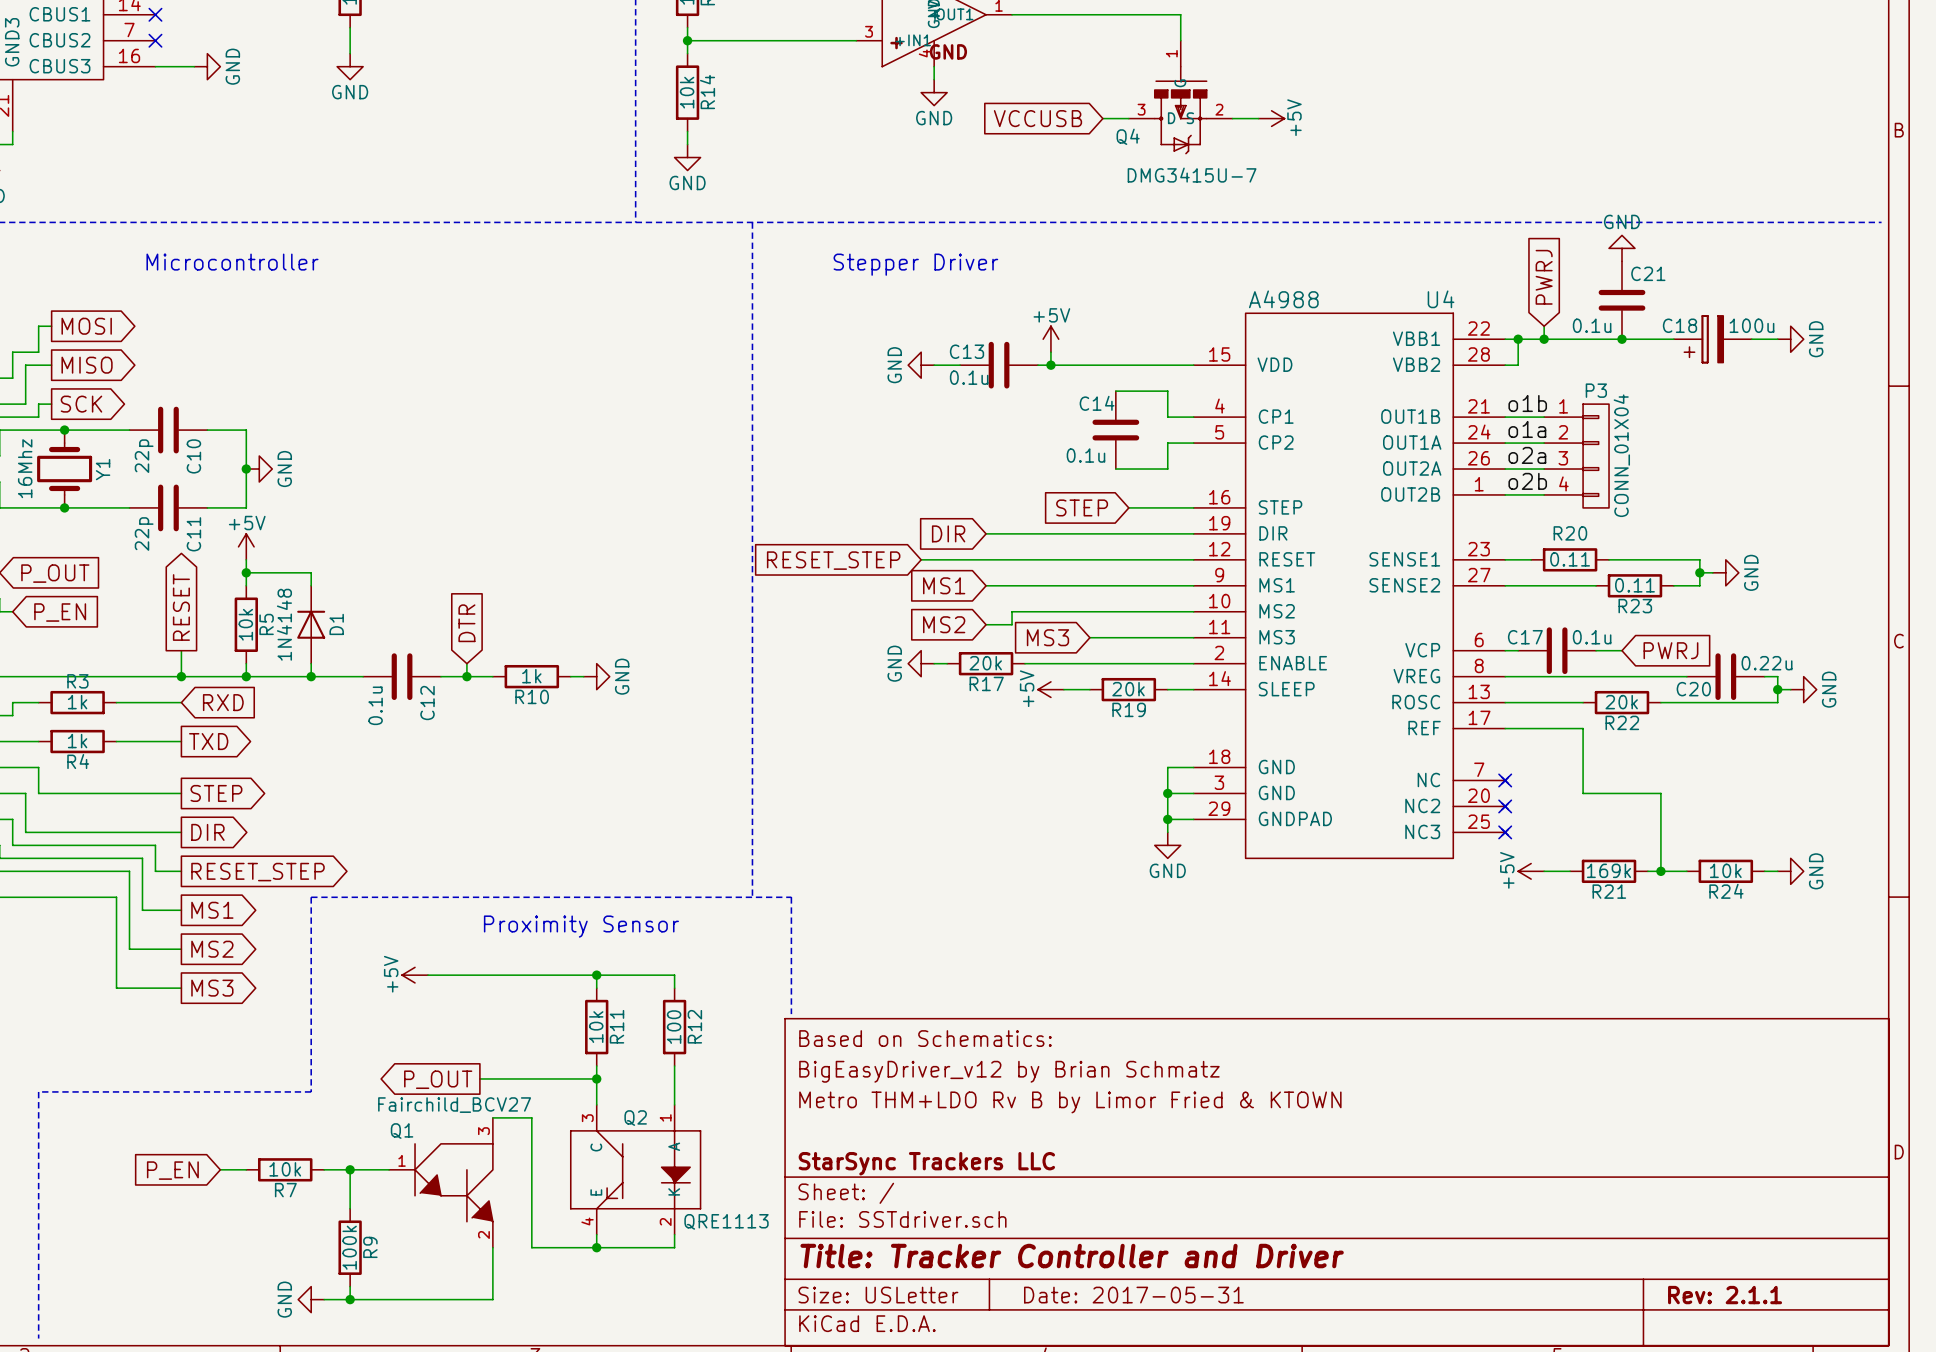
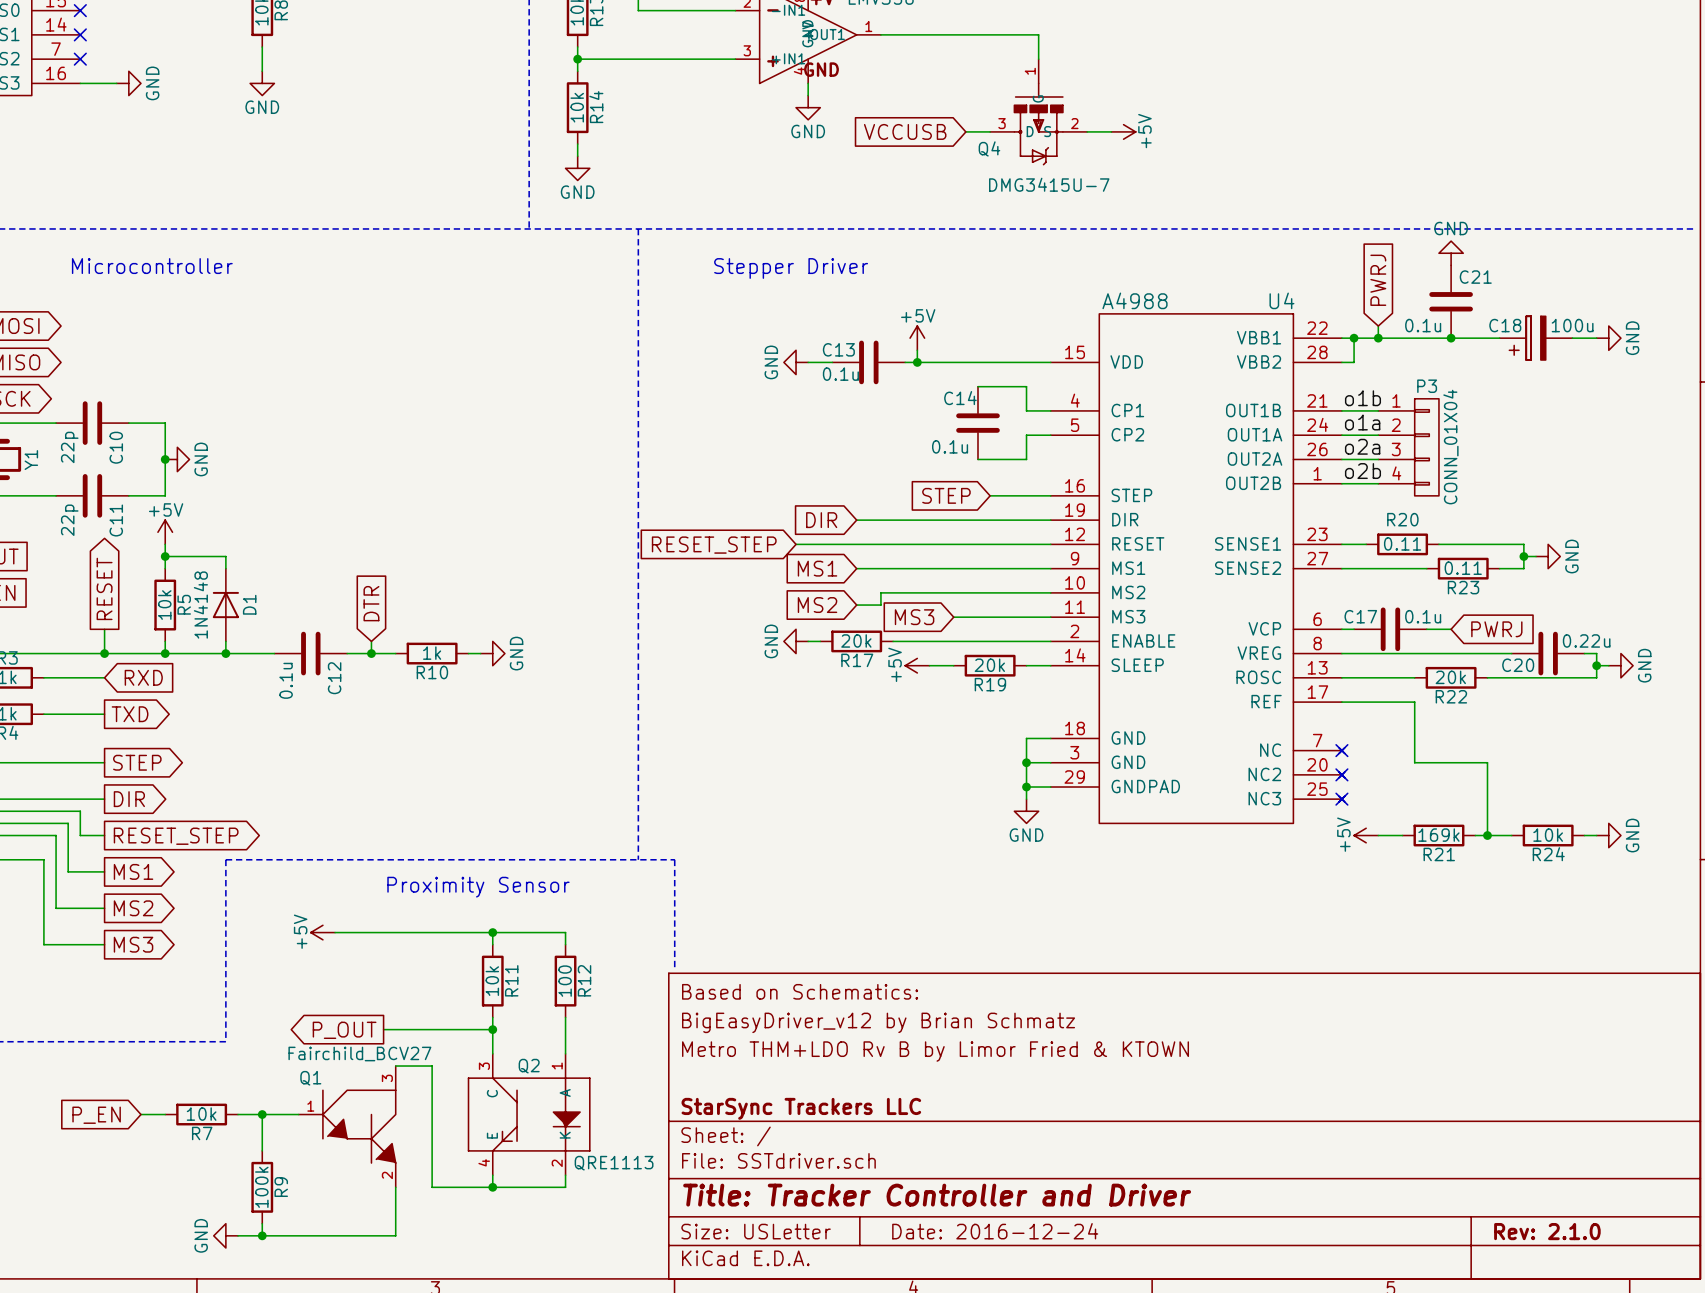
title block: Date: 2017-05-31 (1133, 1295) -> Date: 2016-12-24 (995, 1231)
title block: Rev: 2.1.1 (1725, 1295) -> Rev: 2.1.0 (1547, 1231)

